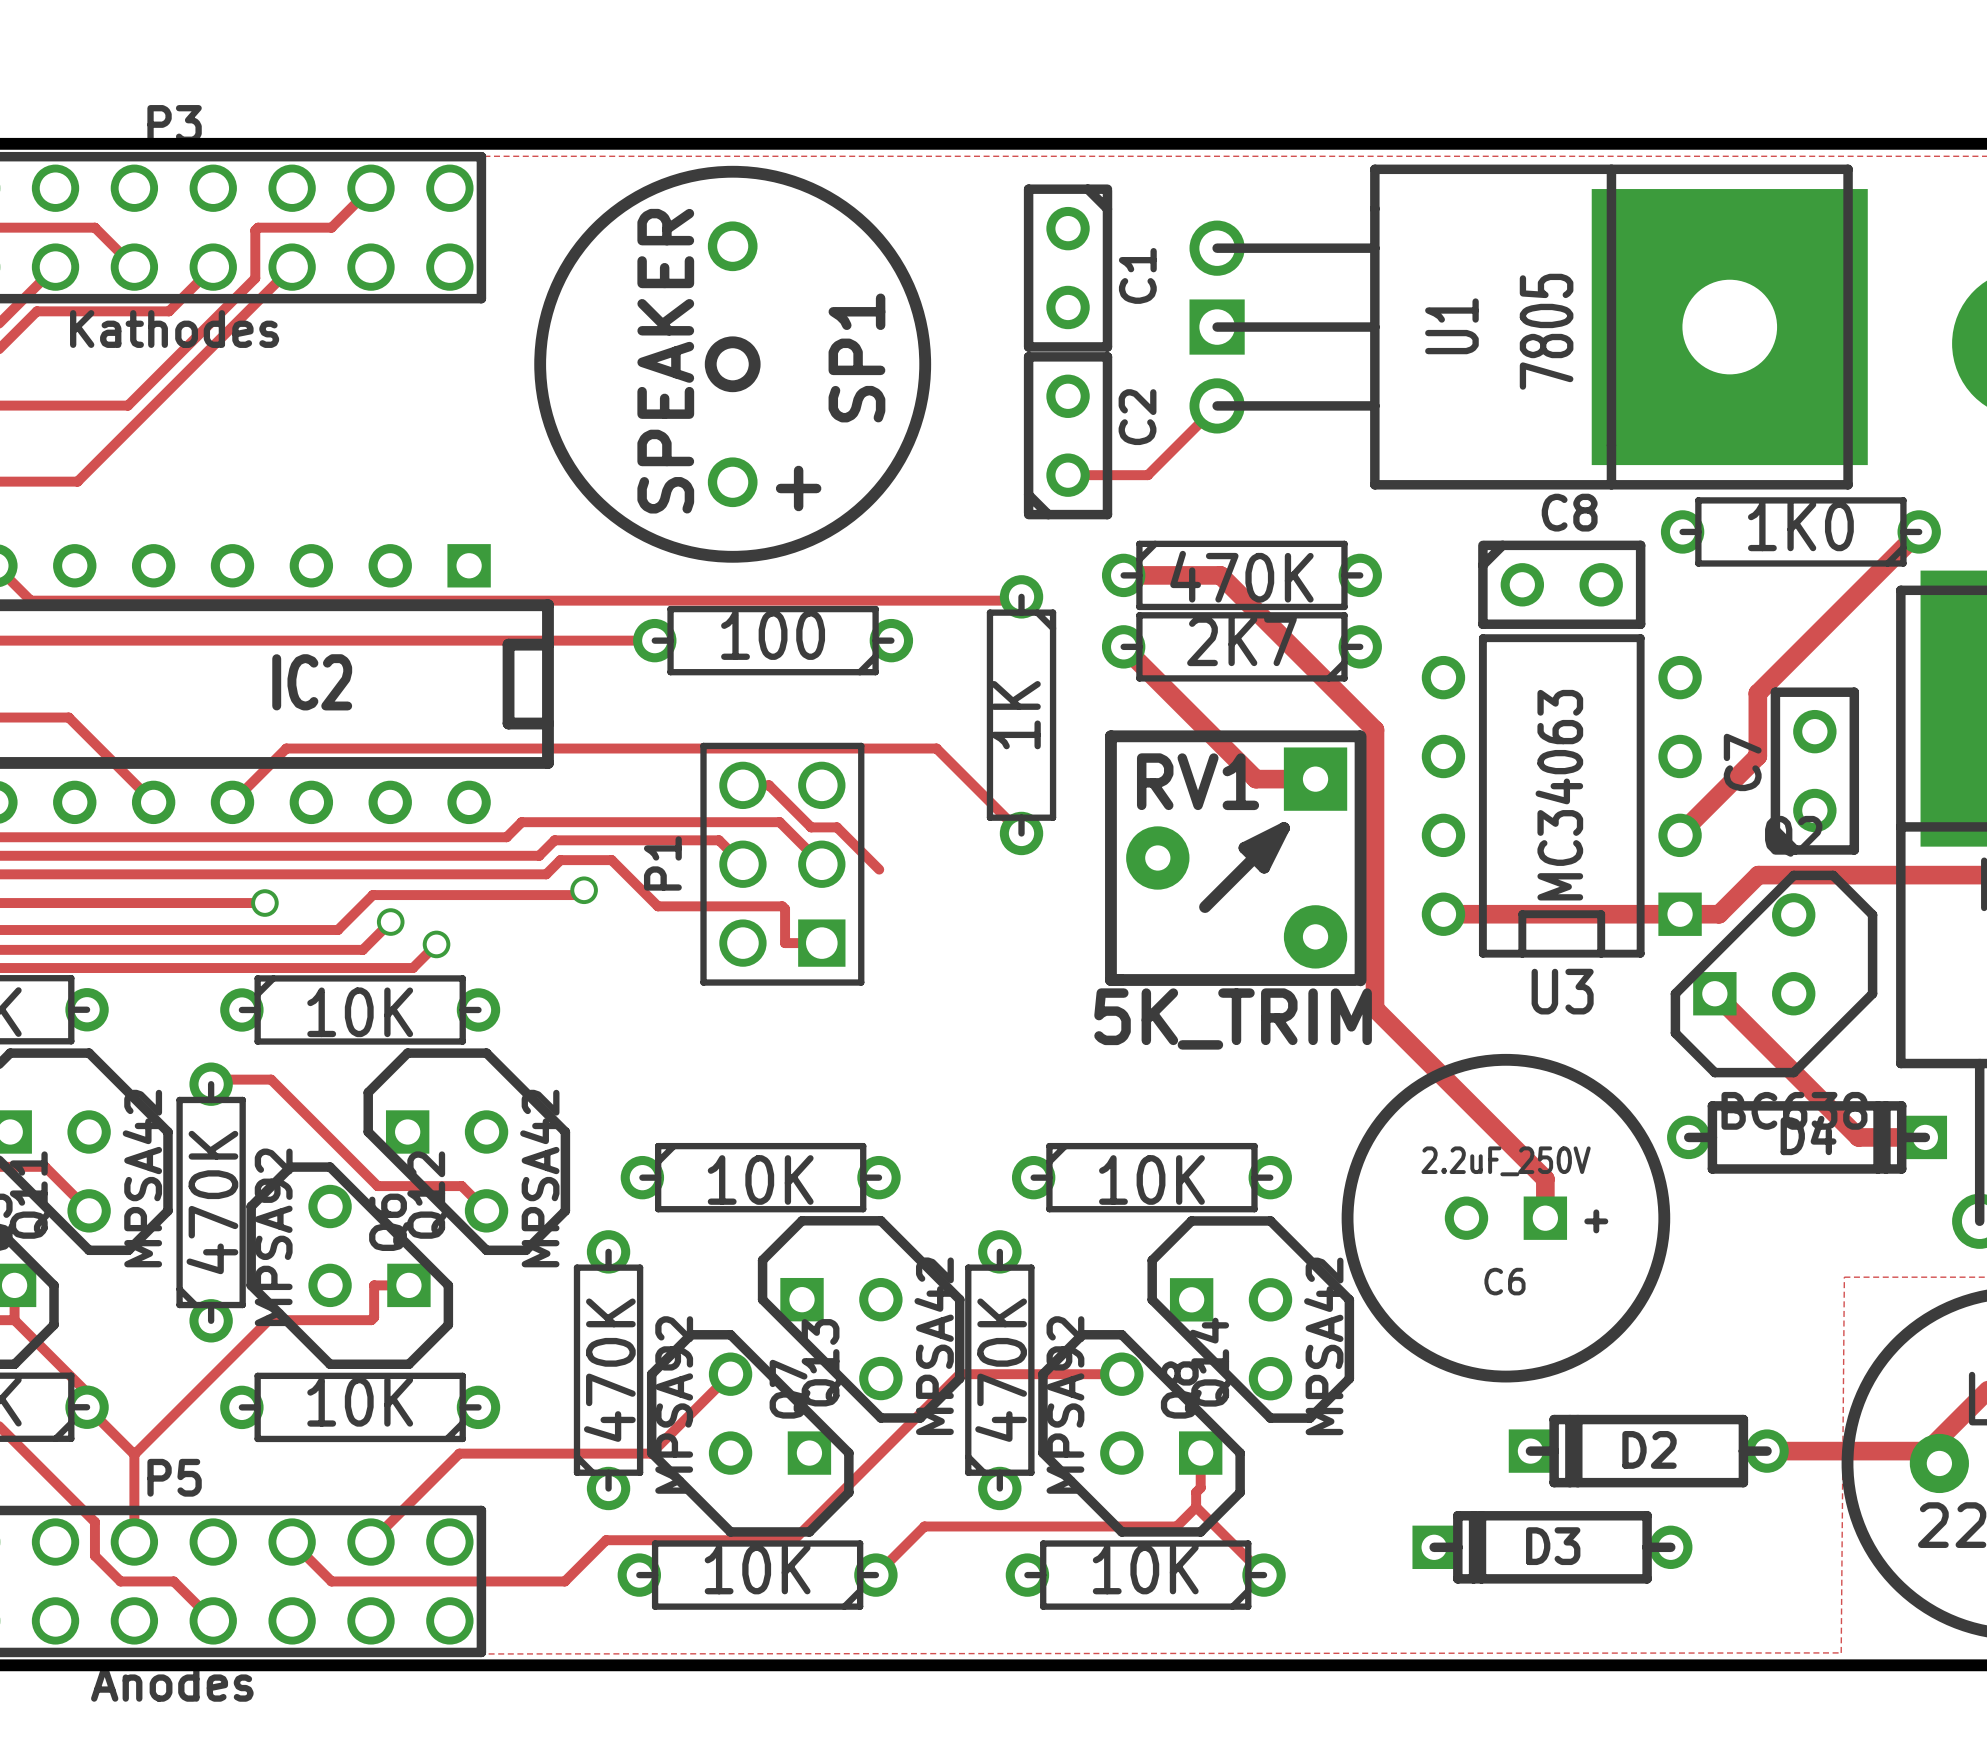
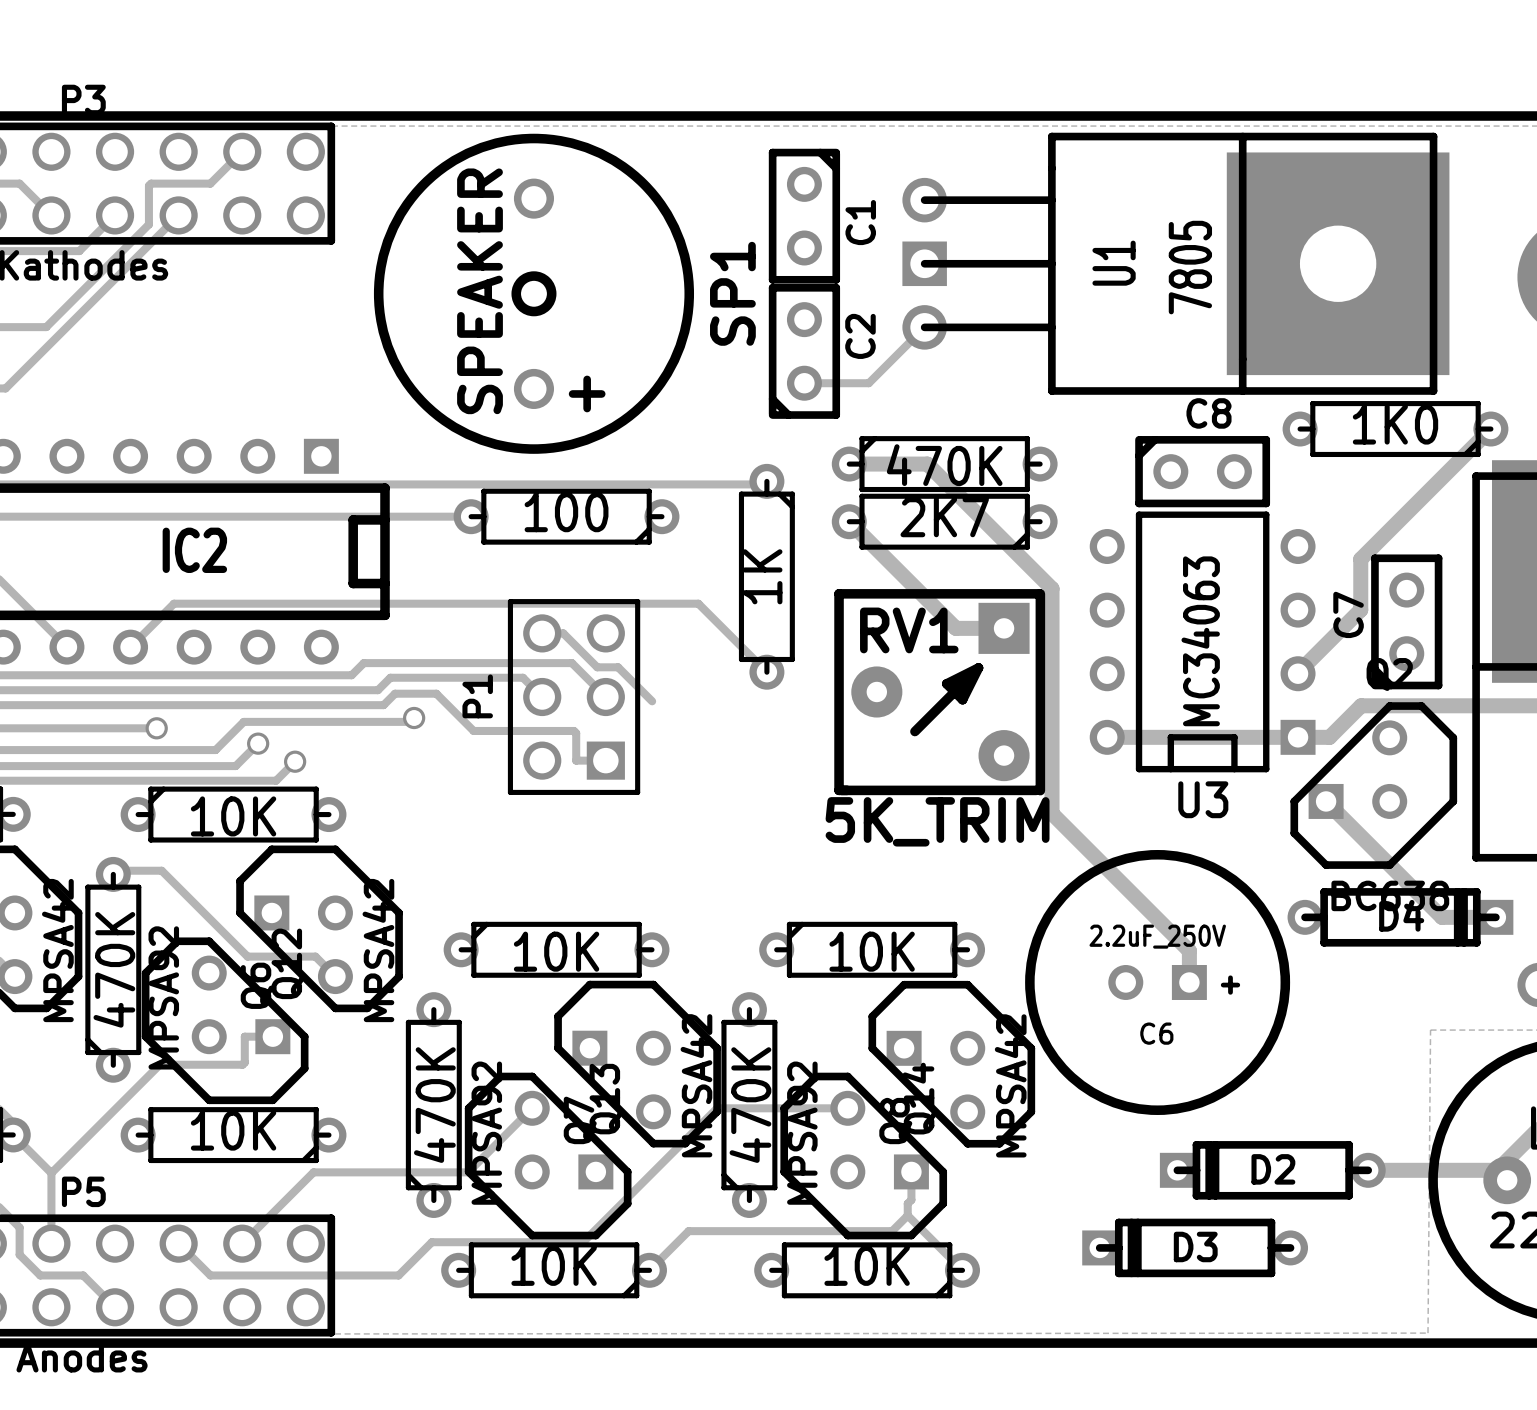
SP1 name position: SP1 (856, 357) -> SP1 (732, 293)

